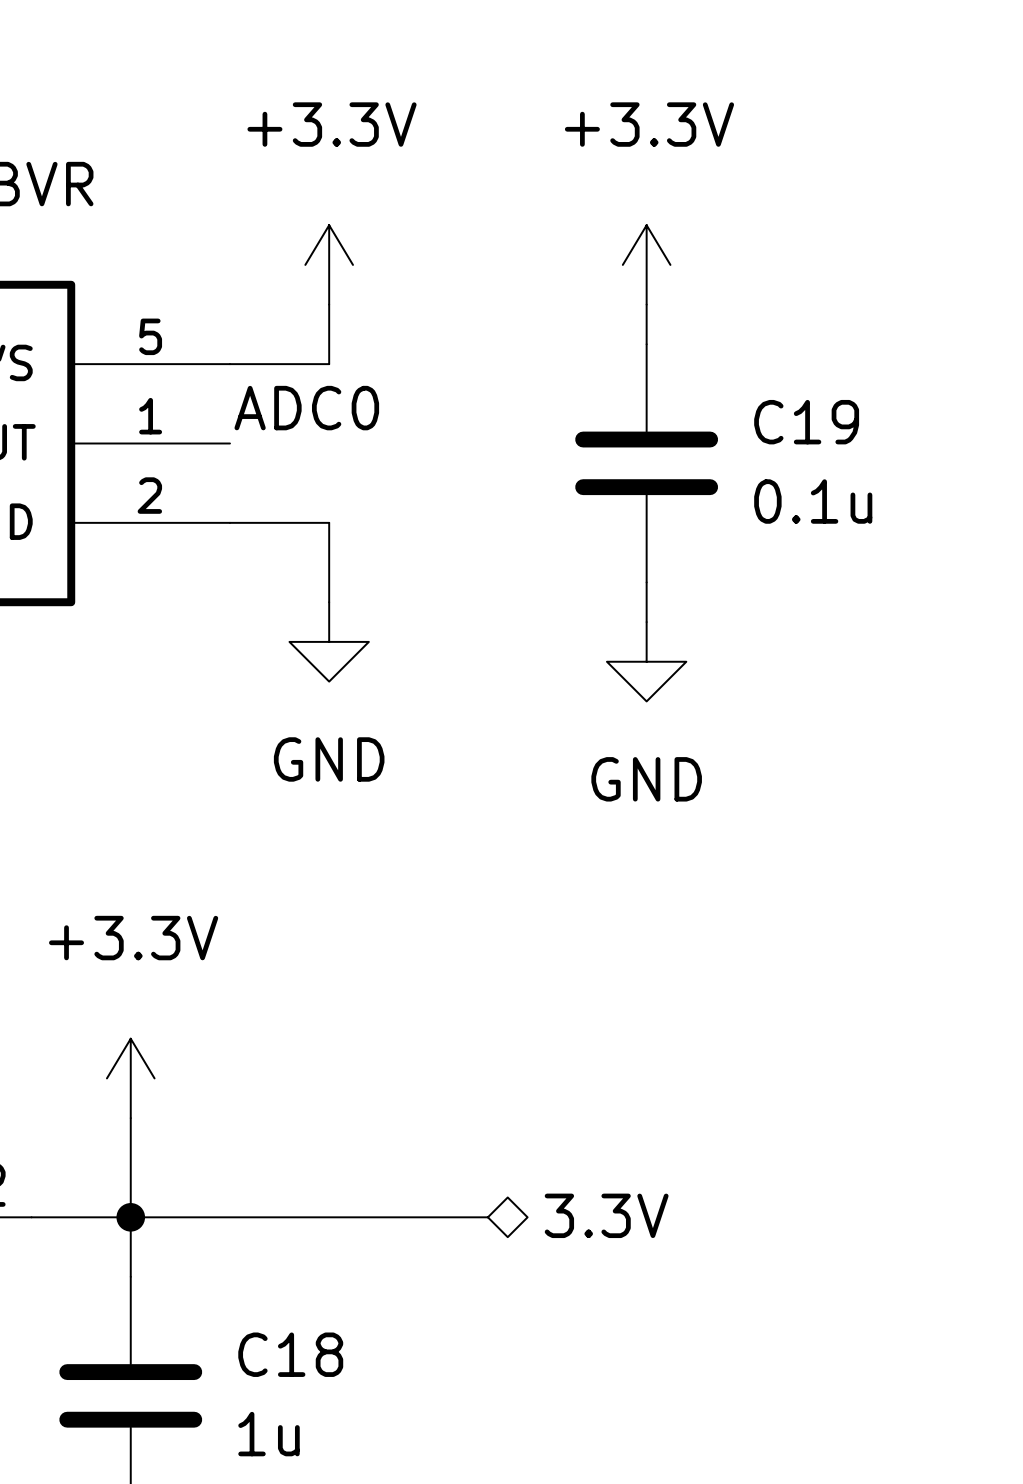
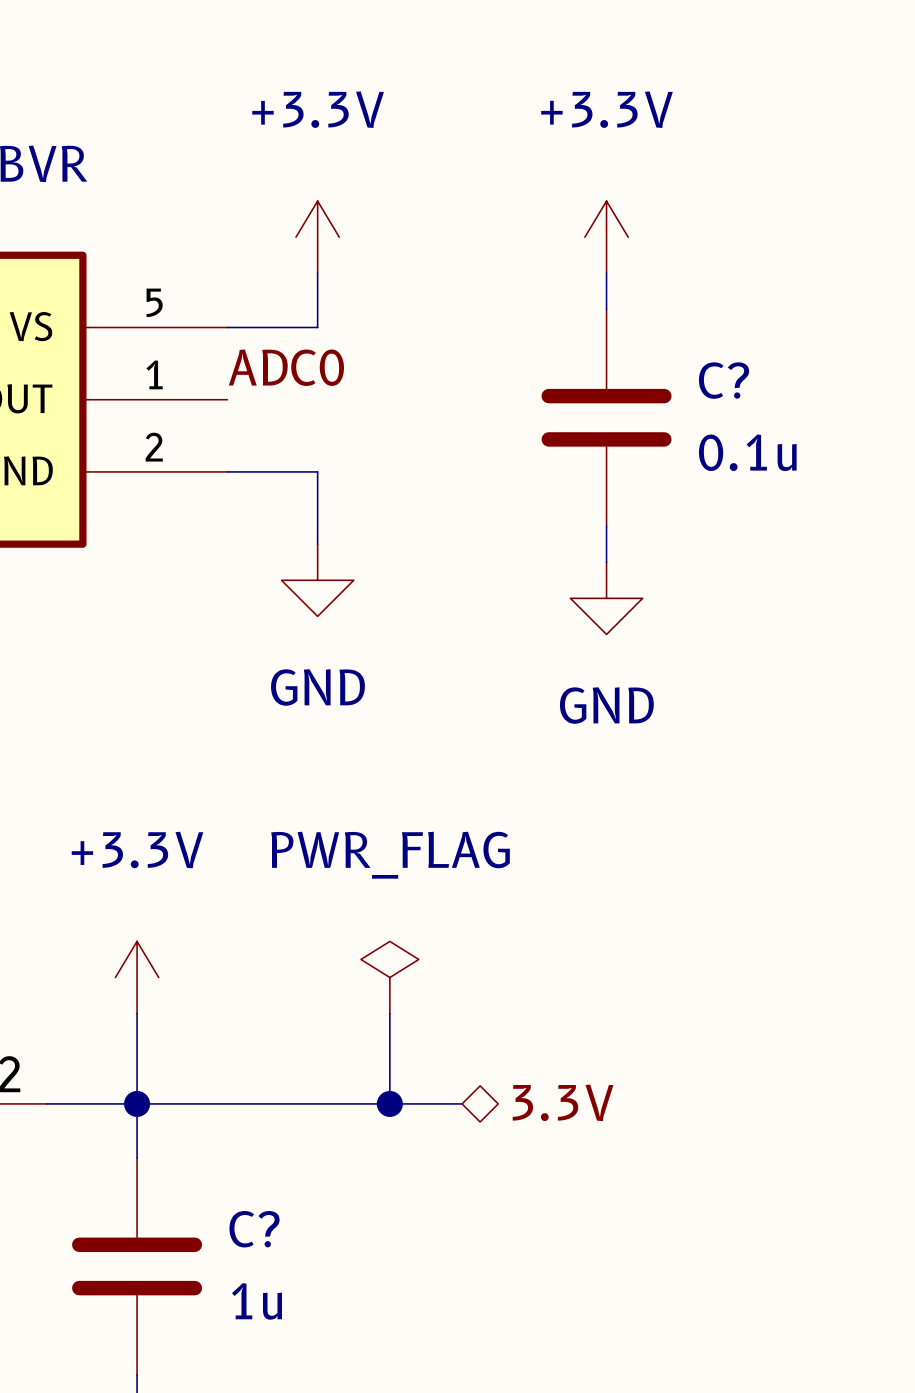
C19 name: C19 (806, 422) -> C? (724, 380)
power symbol: none -> PWR_FLAG (389, 977)
wire: none -> (389, 1013) (389, 1103)
junction: none -> (389, 1103)
C18 name: C18 (290, 1354) -> C? (254, 1229)

